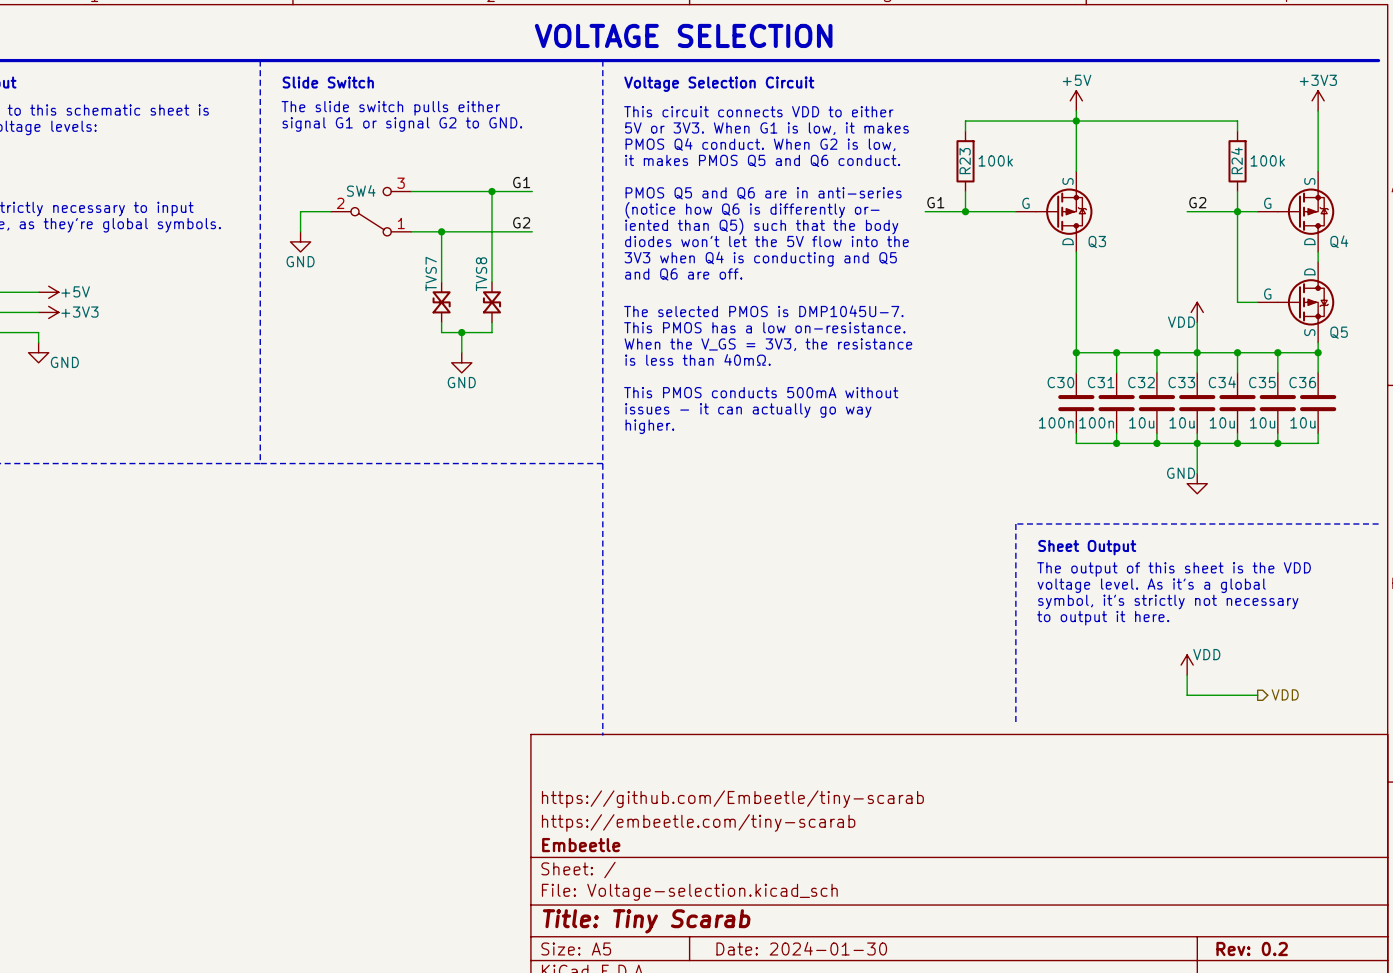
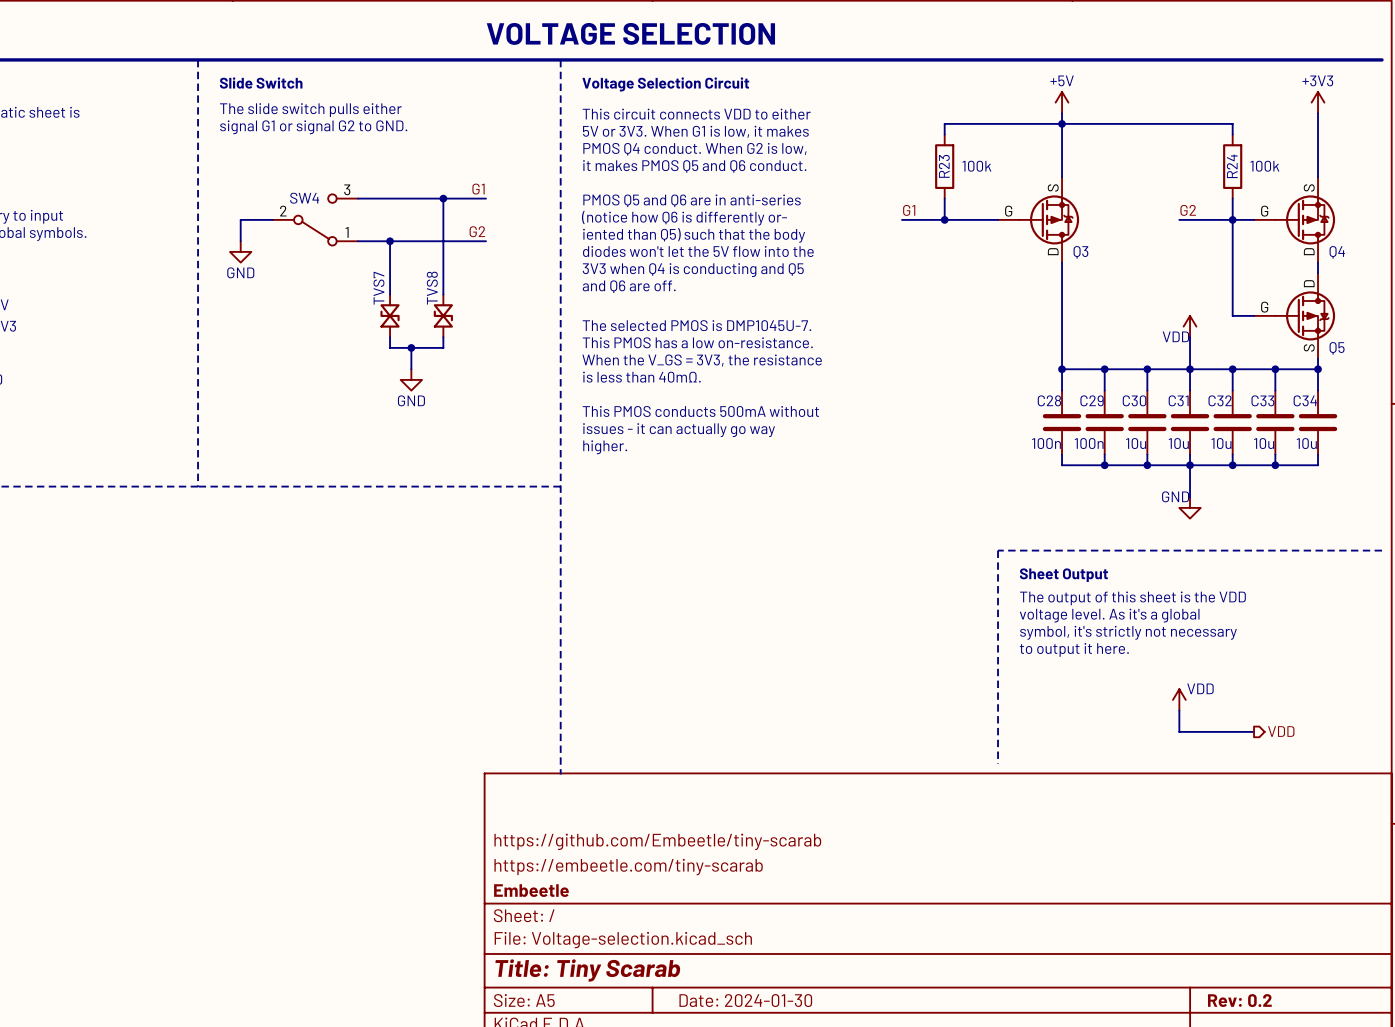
C30 name: C30 (1060, 382) -> C28 (1049, 400)
C31 name: C31 (1101, 382) -> C29 (1092, 400)
C32 name: C32 (1141, 382) -> C30 (1134, 400)
C33 name: C33 (1181, 382) -> C31 (1178, 400)
C34 name: C34 (1222, 382) -> C32 (1220, 400)
C35 name: C35 (1262, 382) -> C33 (1262, 400)
C36 name: C36 (1302, 382) -> C34 (1305, 400)

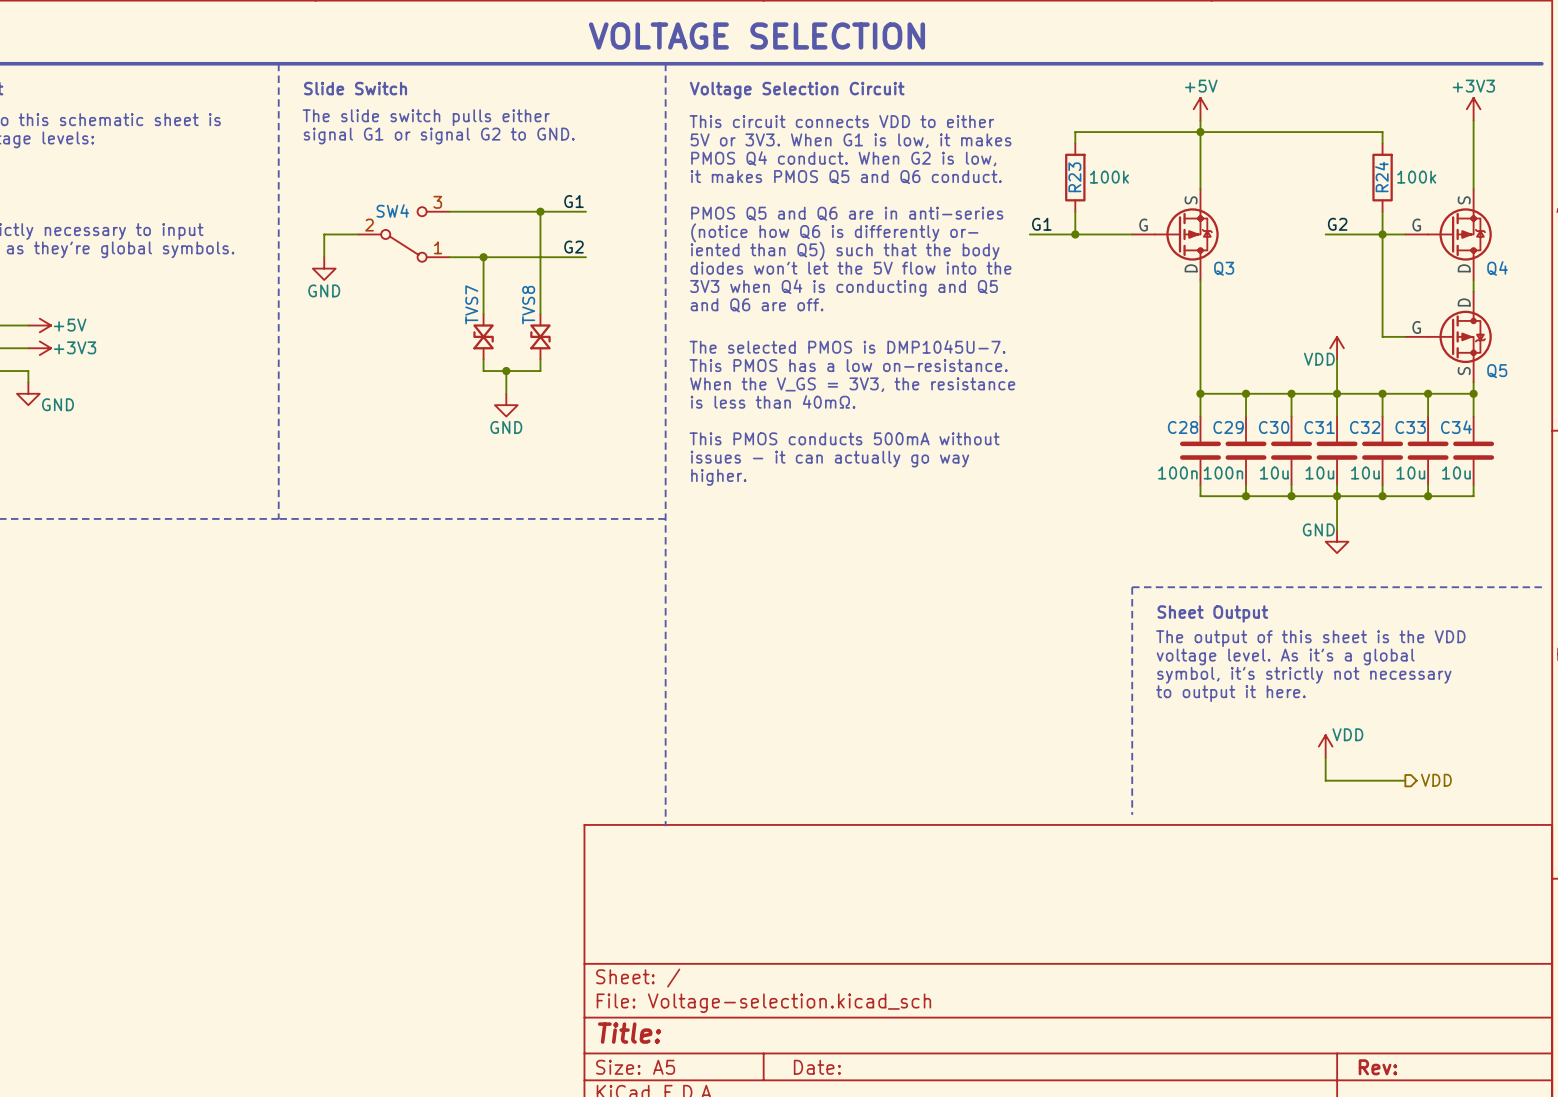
title block: https://github.com/Embeetle/tiny-scarab (657, 841) -> none
title block: https://embeetle.com/tiny-scarab (628, 867) -> none
title block: Embeetle (531, 890) -> none
title block: Title: Tiny Scarab (587, 970) -> Title: (629, 1033)
title block: Date: 2024-01-30 (745, 1000) -> Date: (817, 1067)
title block: Rev: 0.2 (1239, 1000) -> Rev: (1377, 1067)

